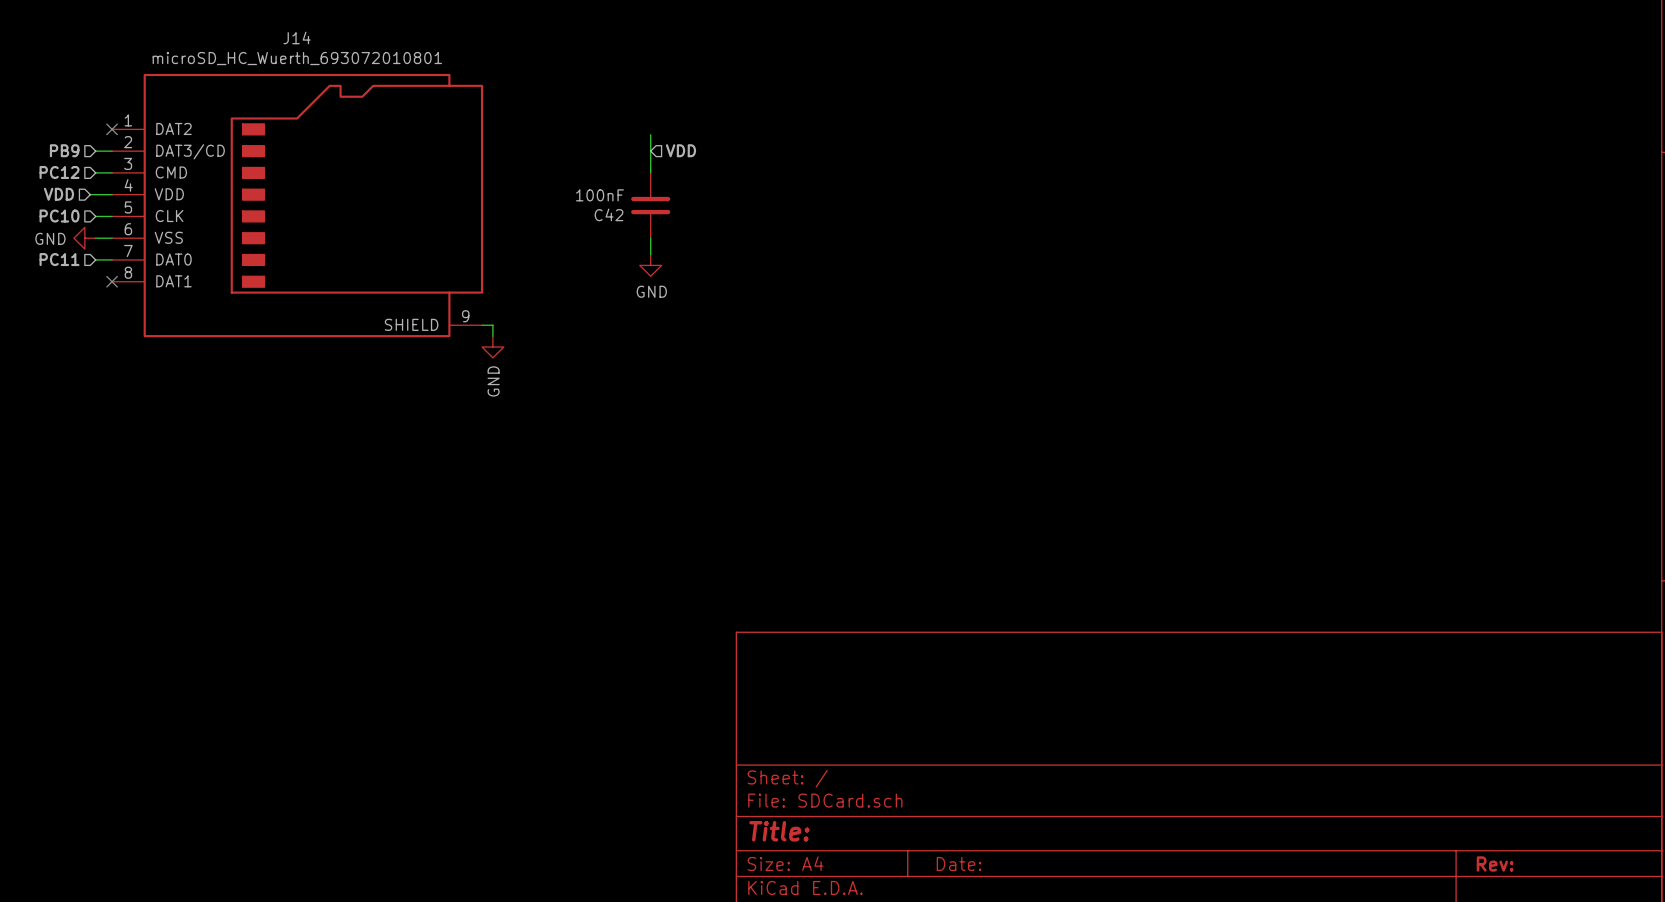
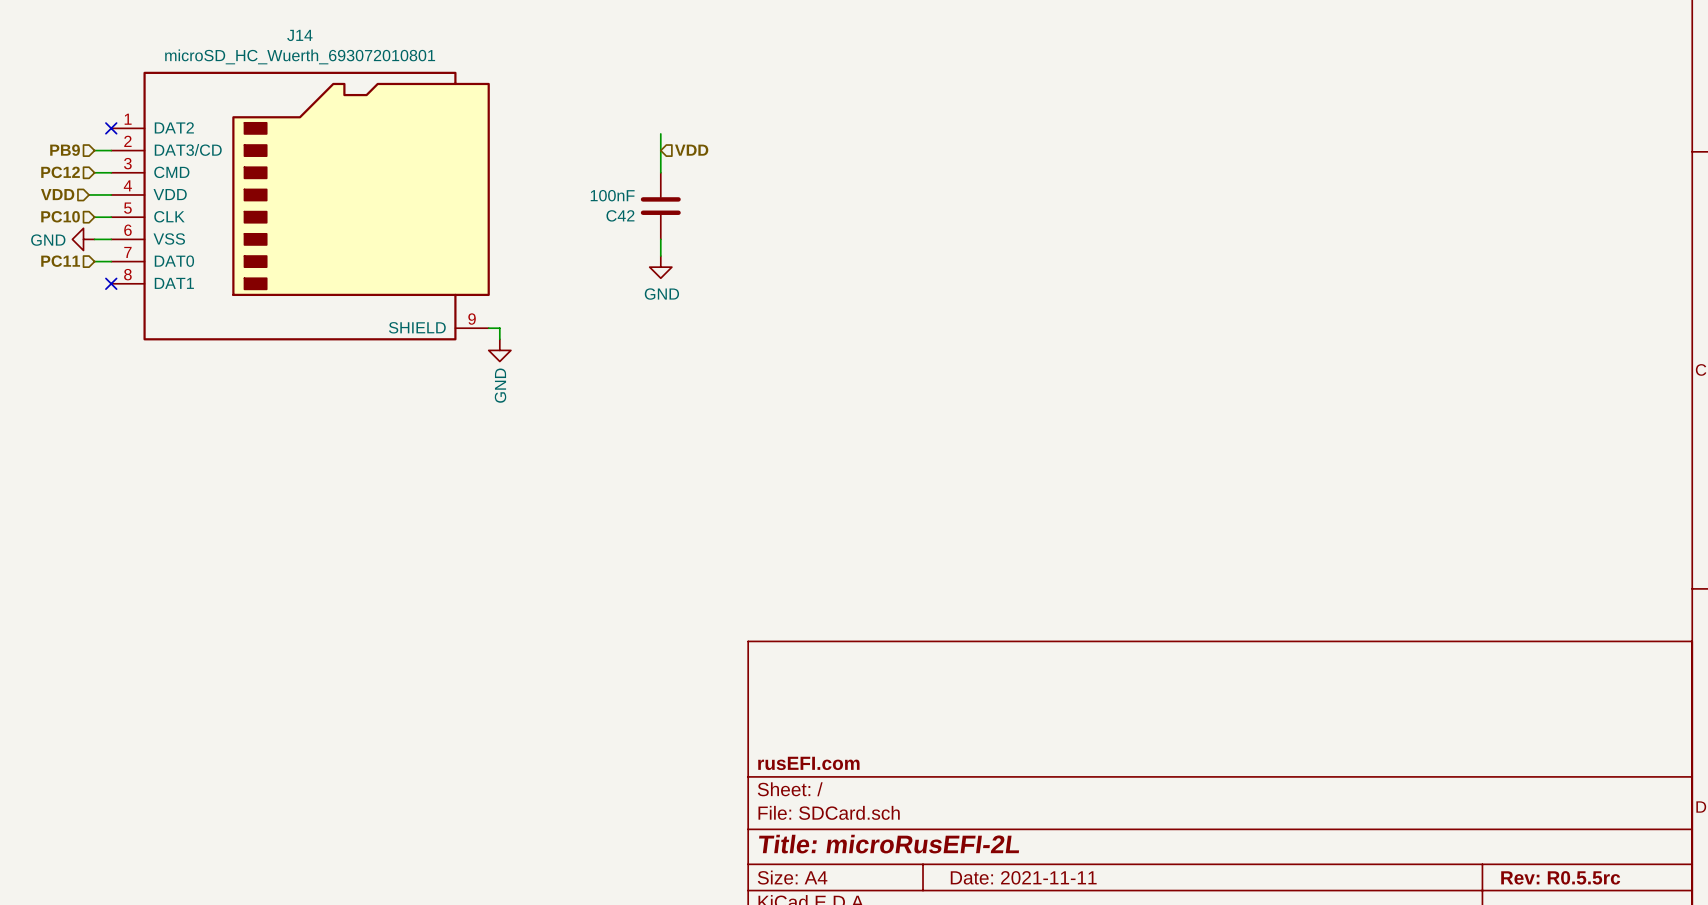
title block: none -> rusEFI.com (808, 763)
title block: Title: (779, 831) -> Title: microRusEFI-2L (889, 844)
title block: Date: (959, 863) -> Date: 2021-11-11 (1023, 877)
title block: Rev: (1495, 863) -> Rev: R0.5.5rc (1560, 877)

